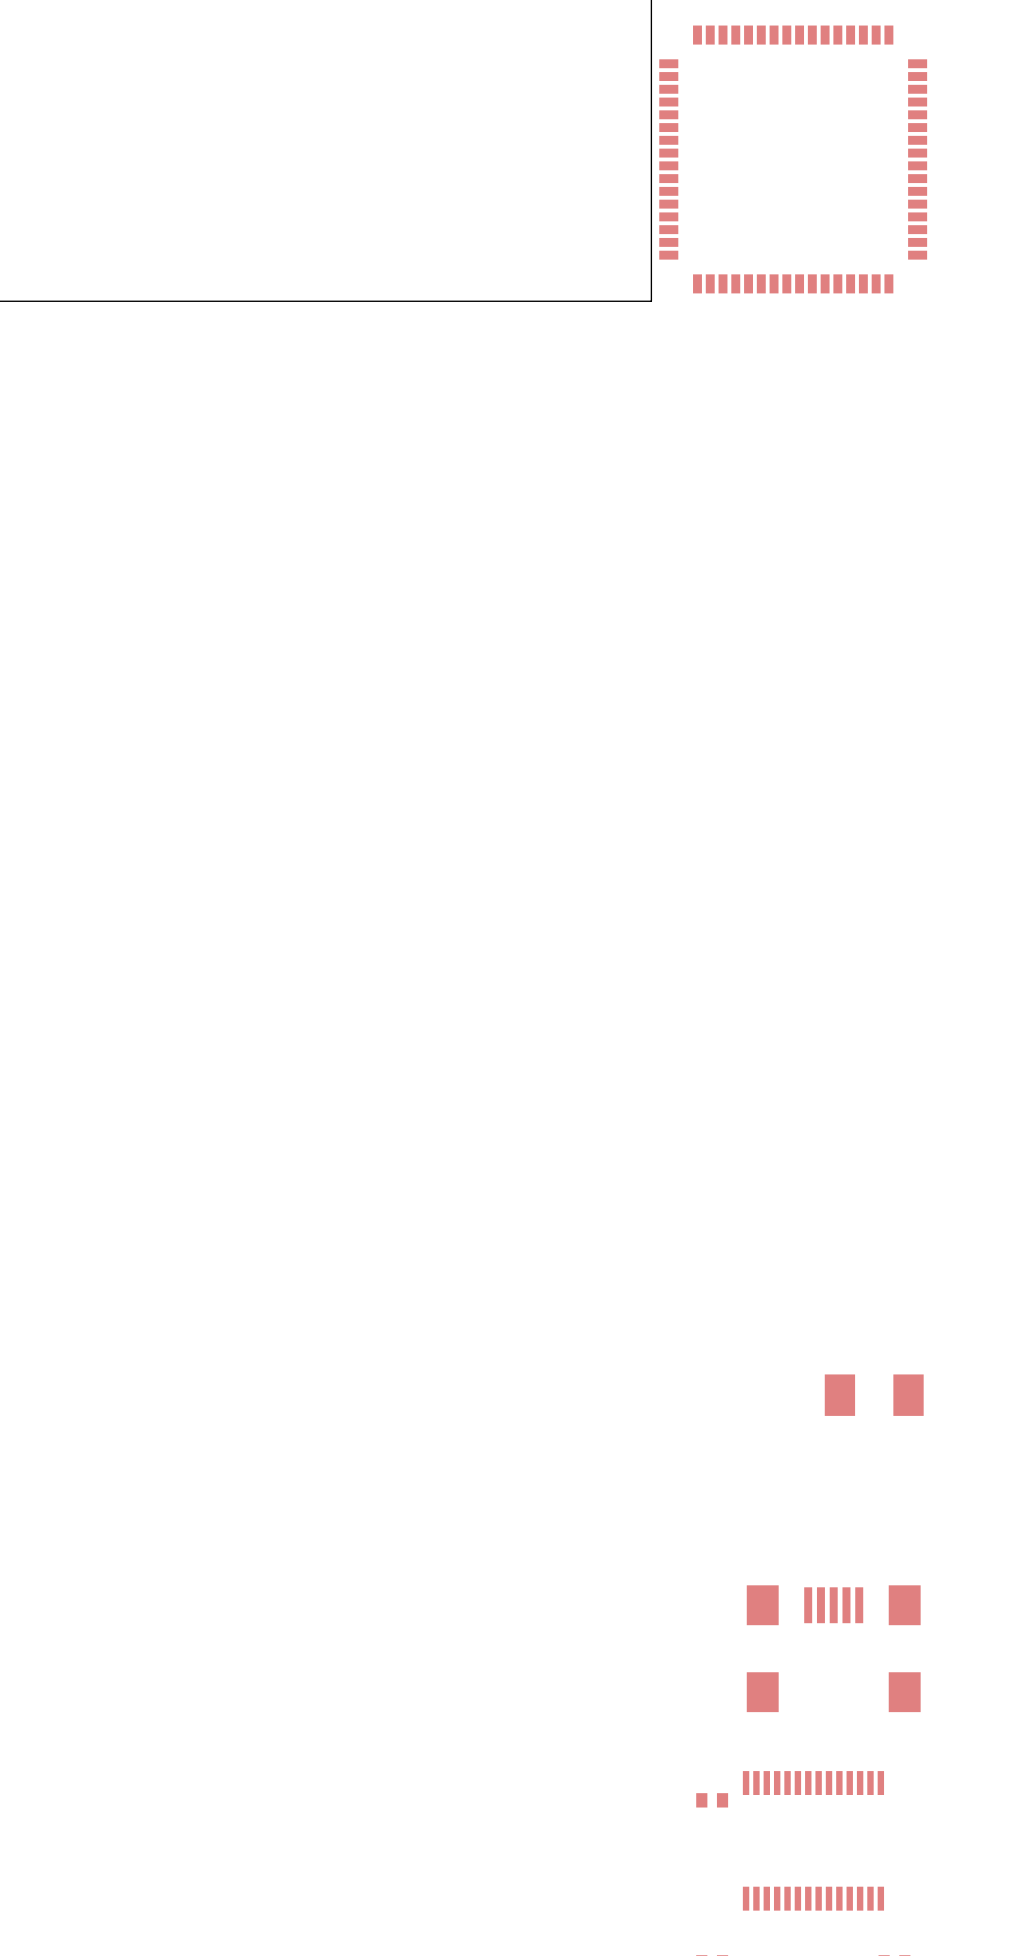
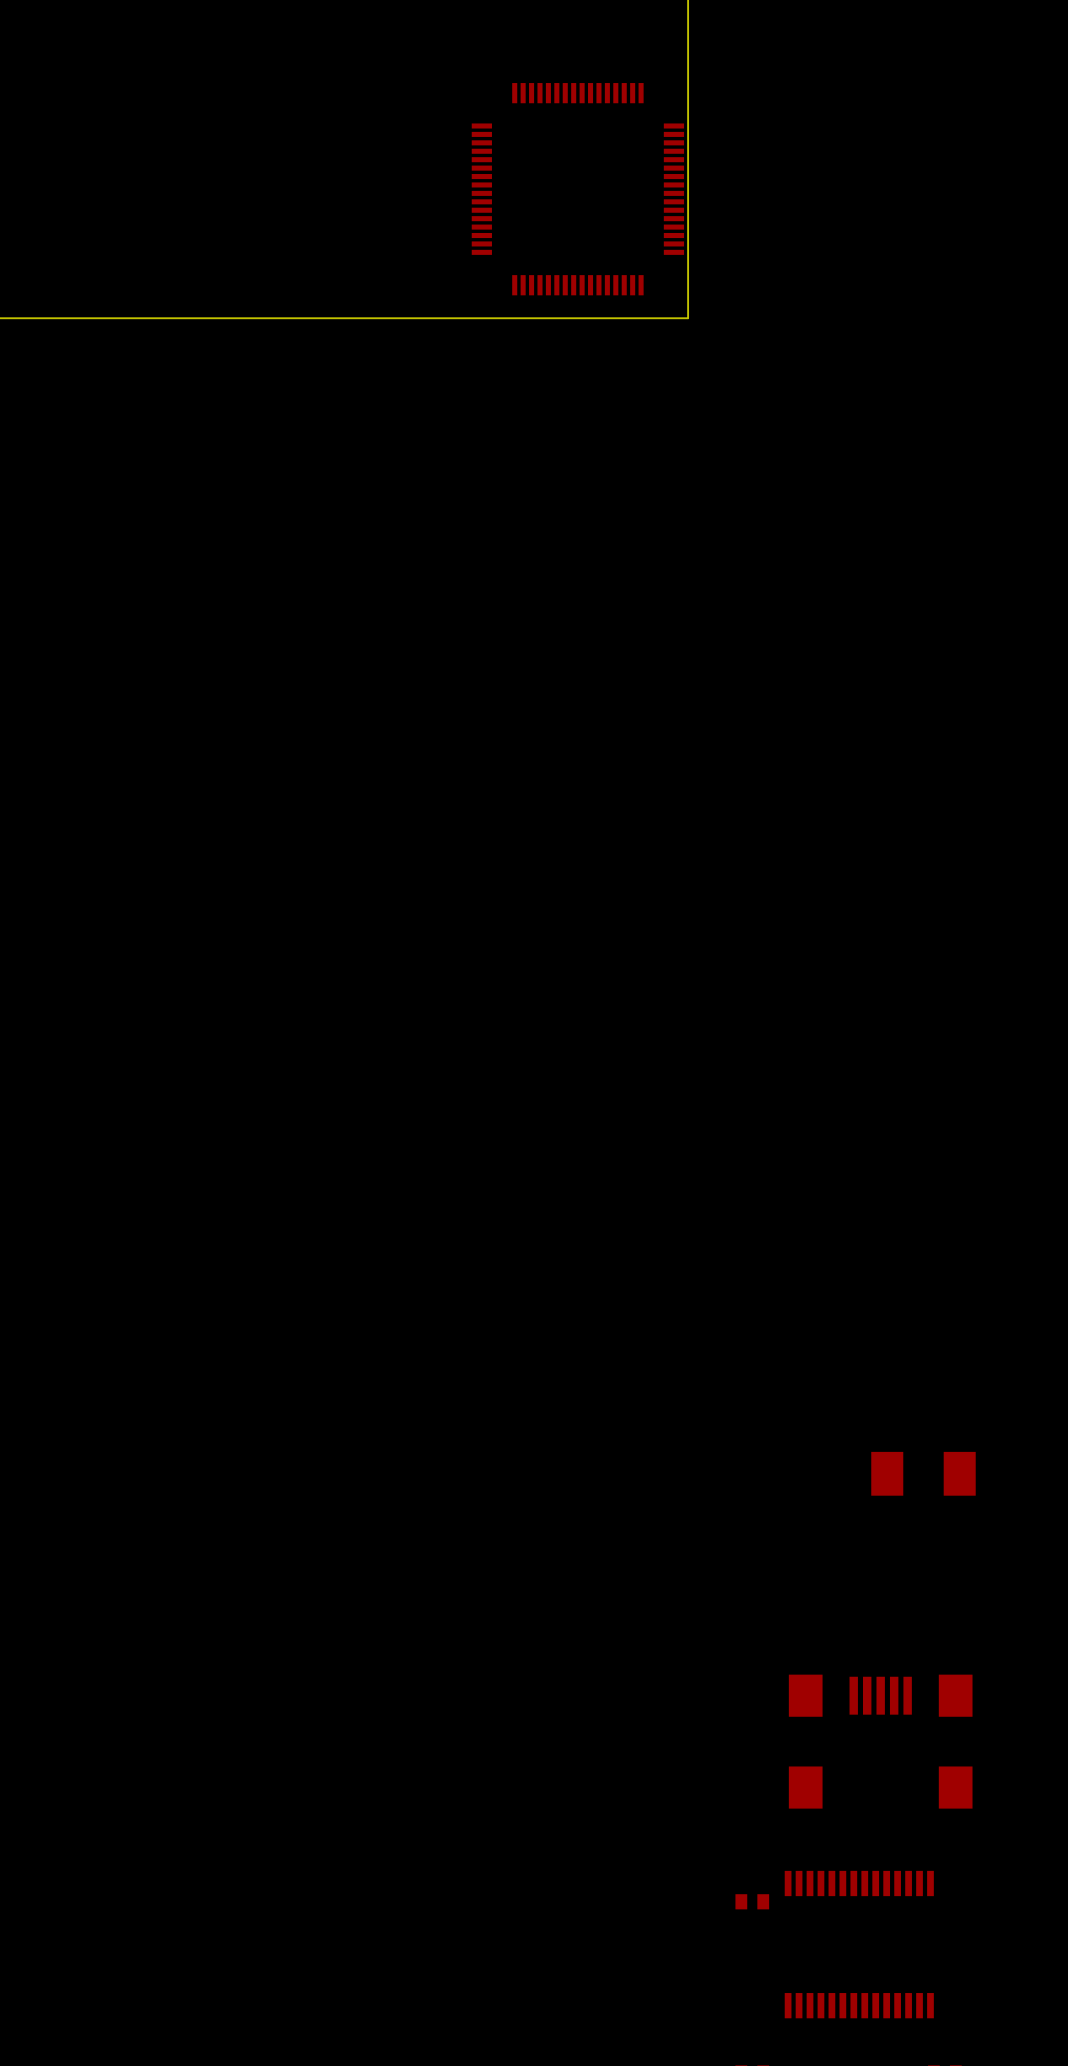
part: (793, 159) -> none
part: none -> (577, 189)

